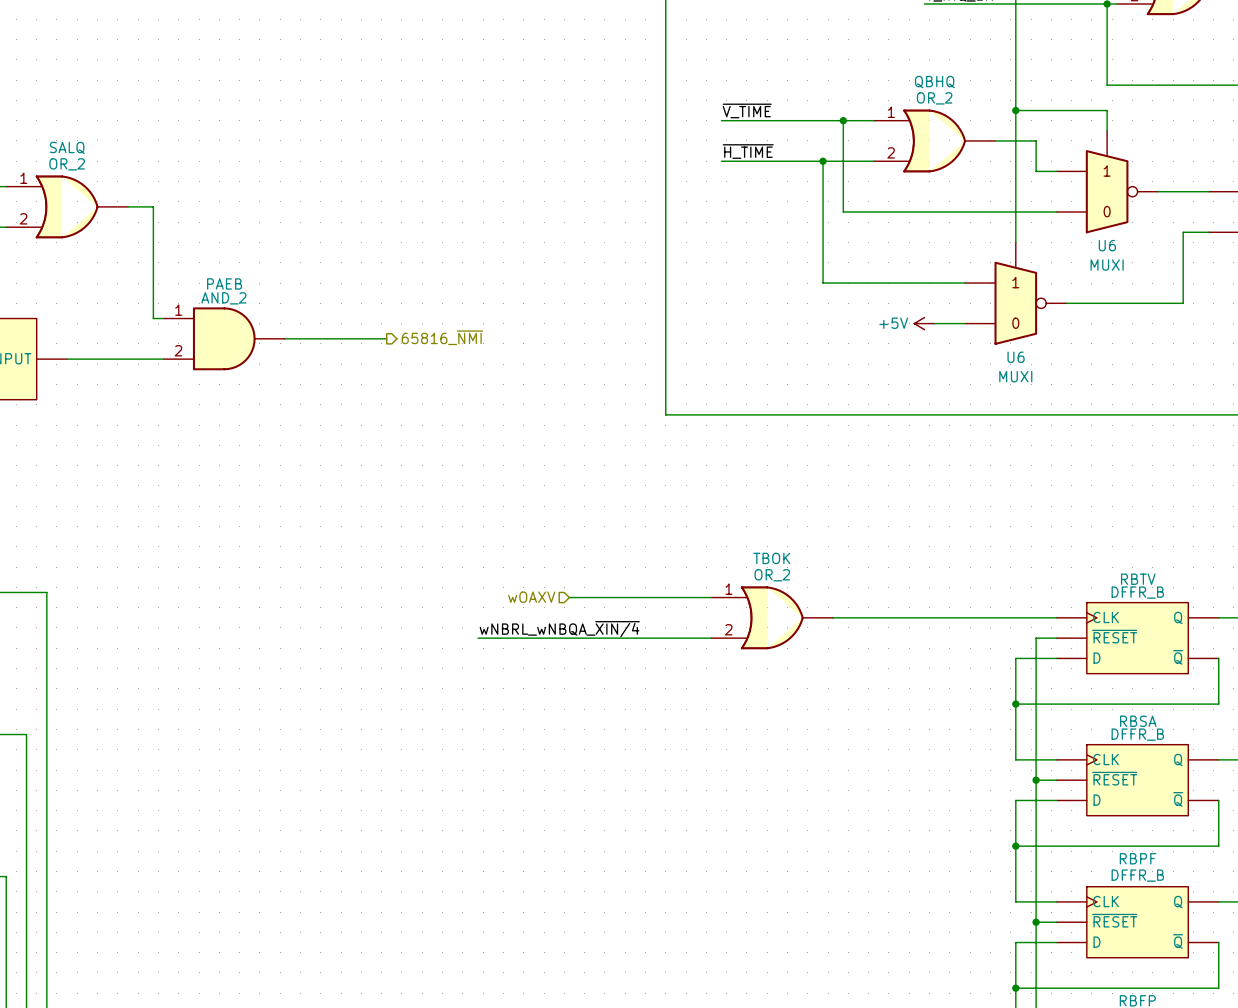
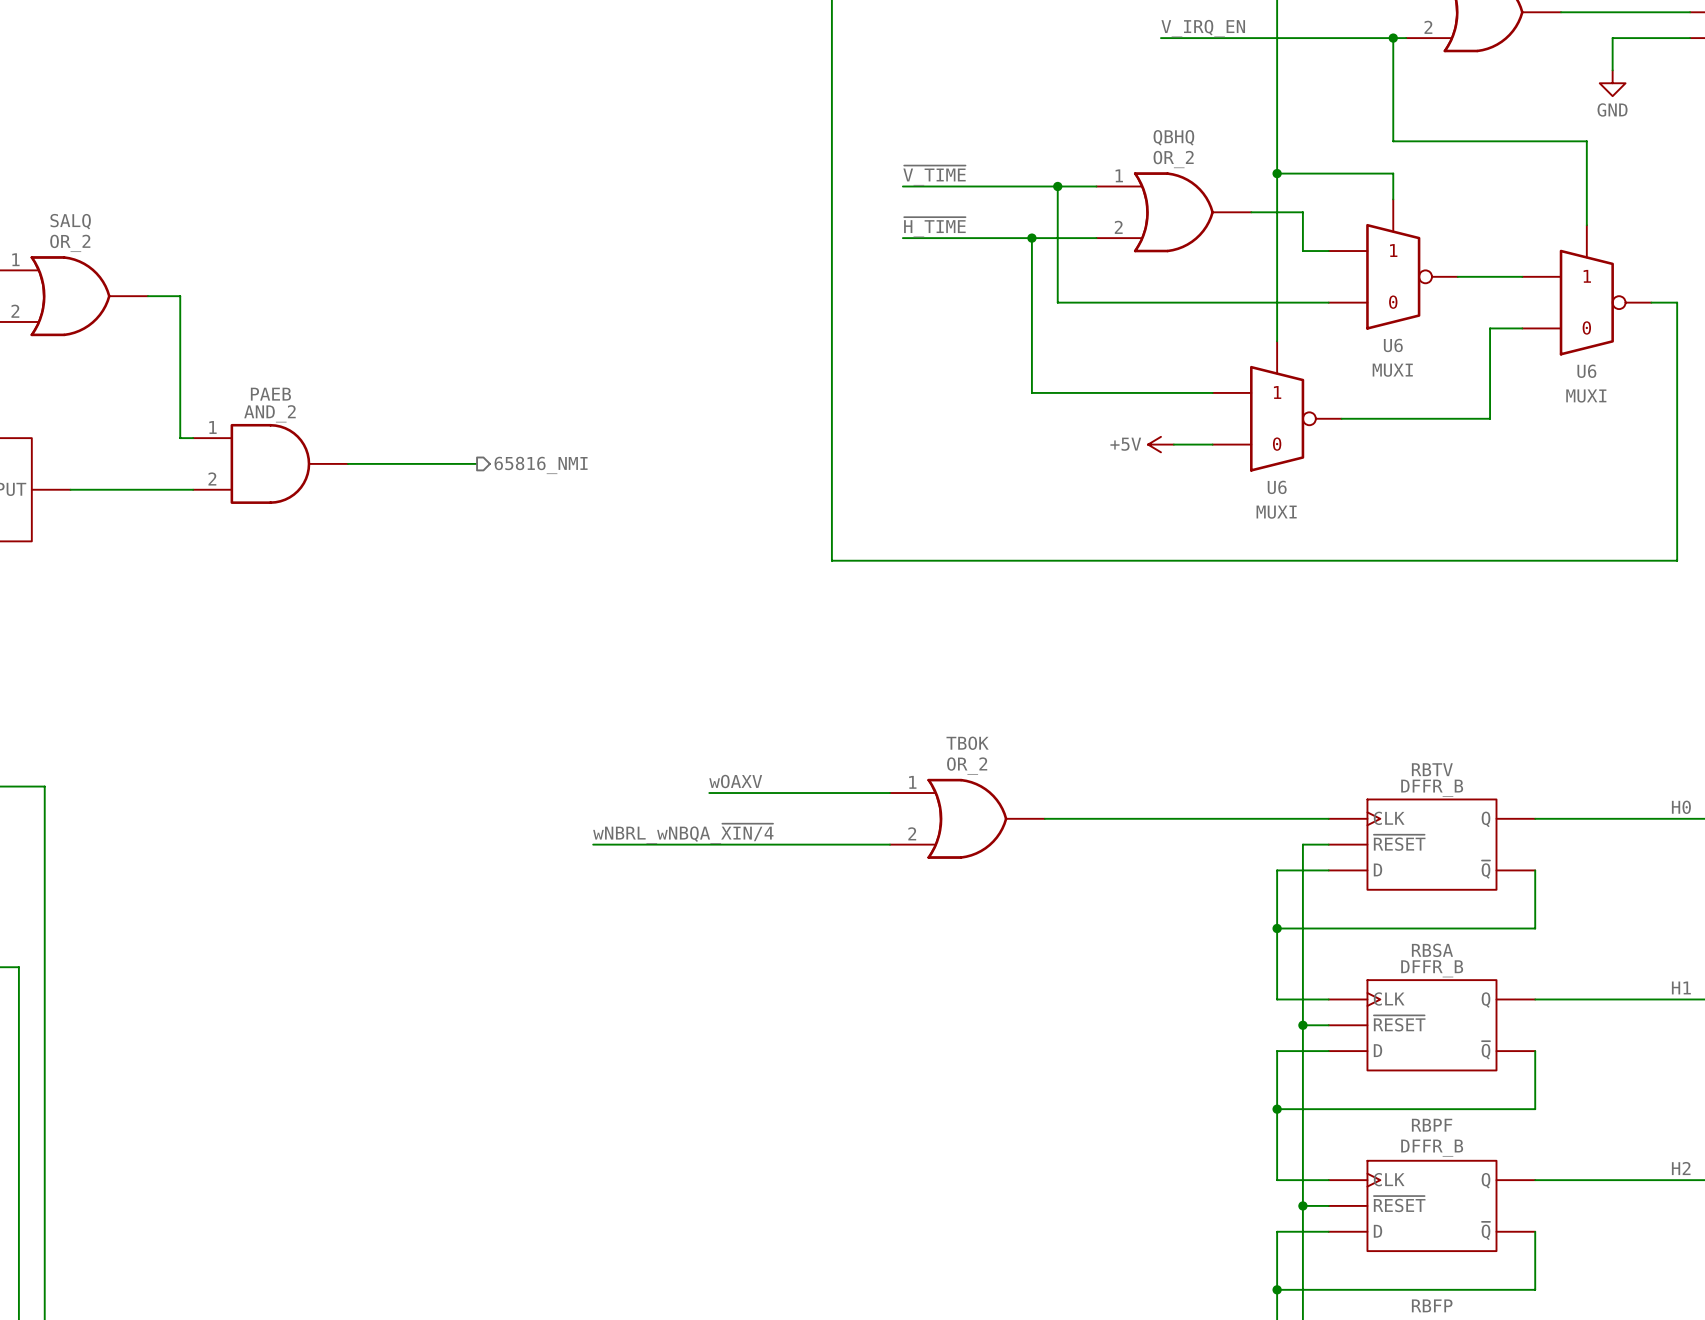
hierarchical label: 65816_~{NMI} (442, 337) -> 65816_NMI (541, 465)
label: none -> wOAXV (735, 781)
hierarchical label: wOAXV (531, 597) -> none

